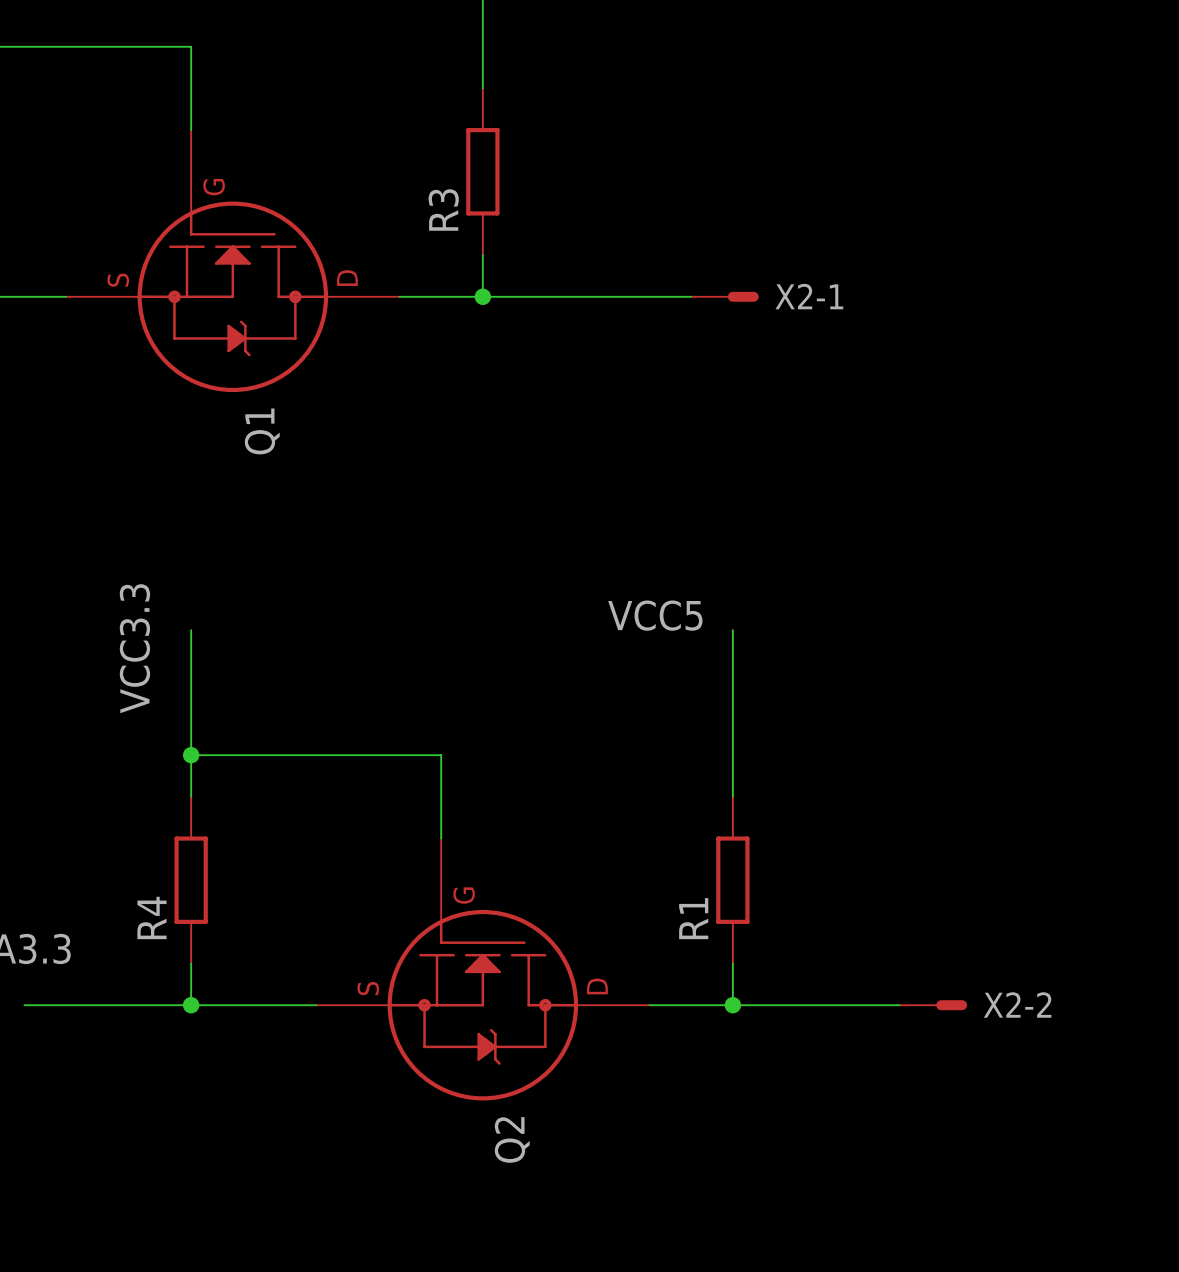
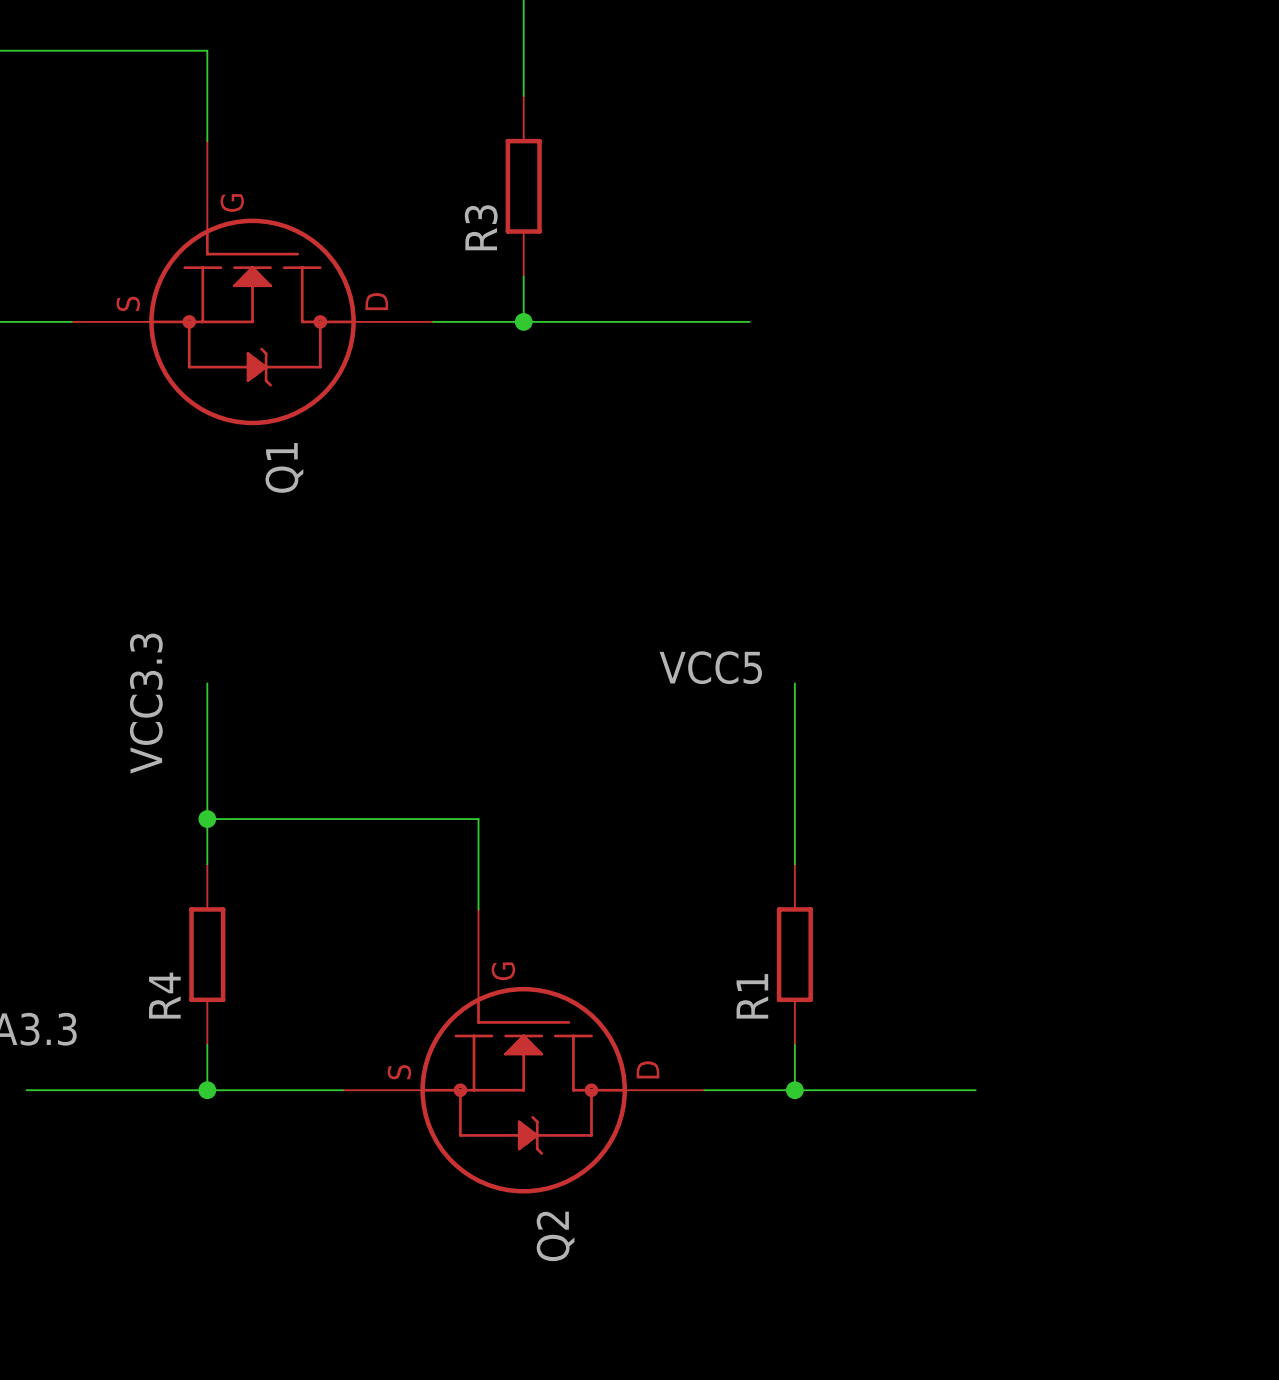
X2-1: (724, 296) -> none
X2-2: (933, 1005) -> none

